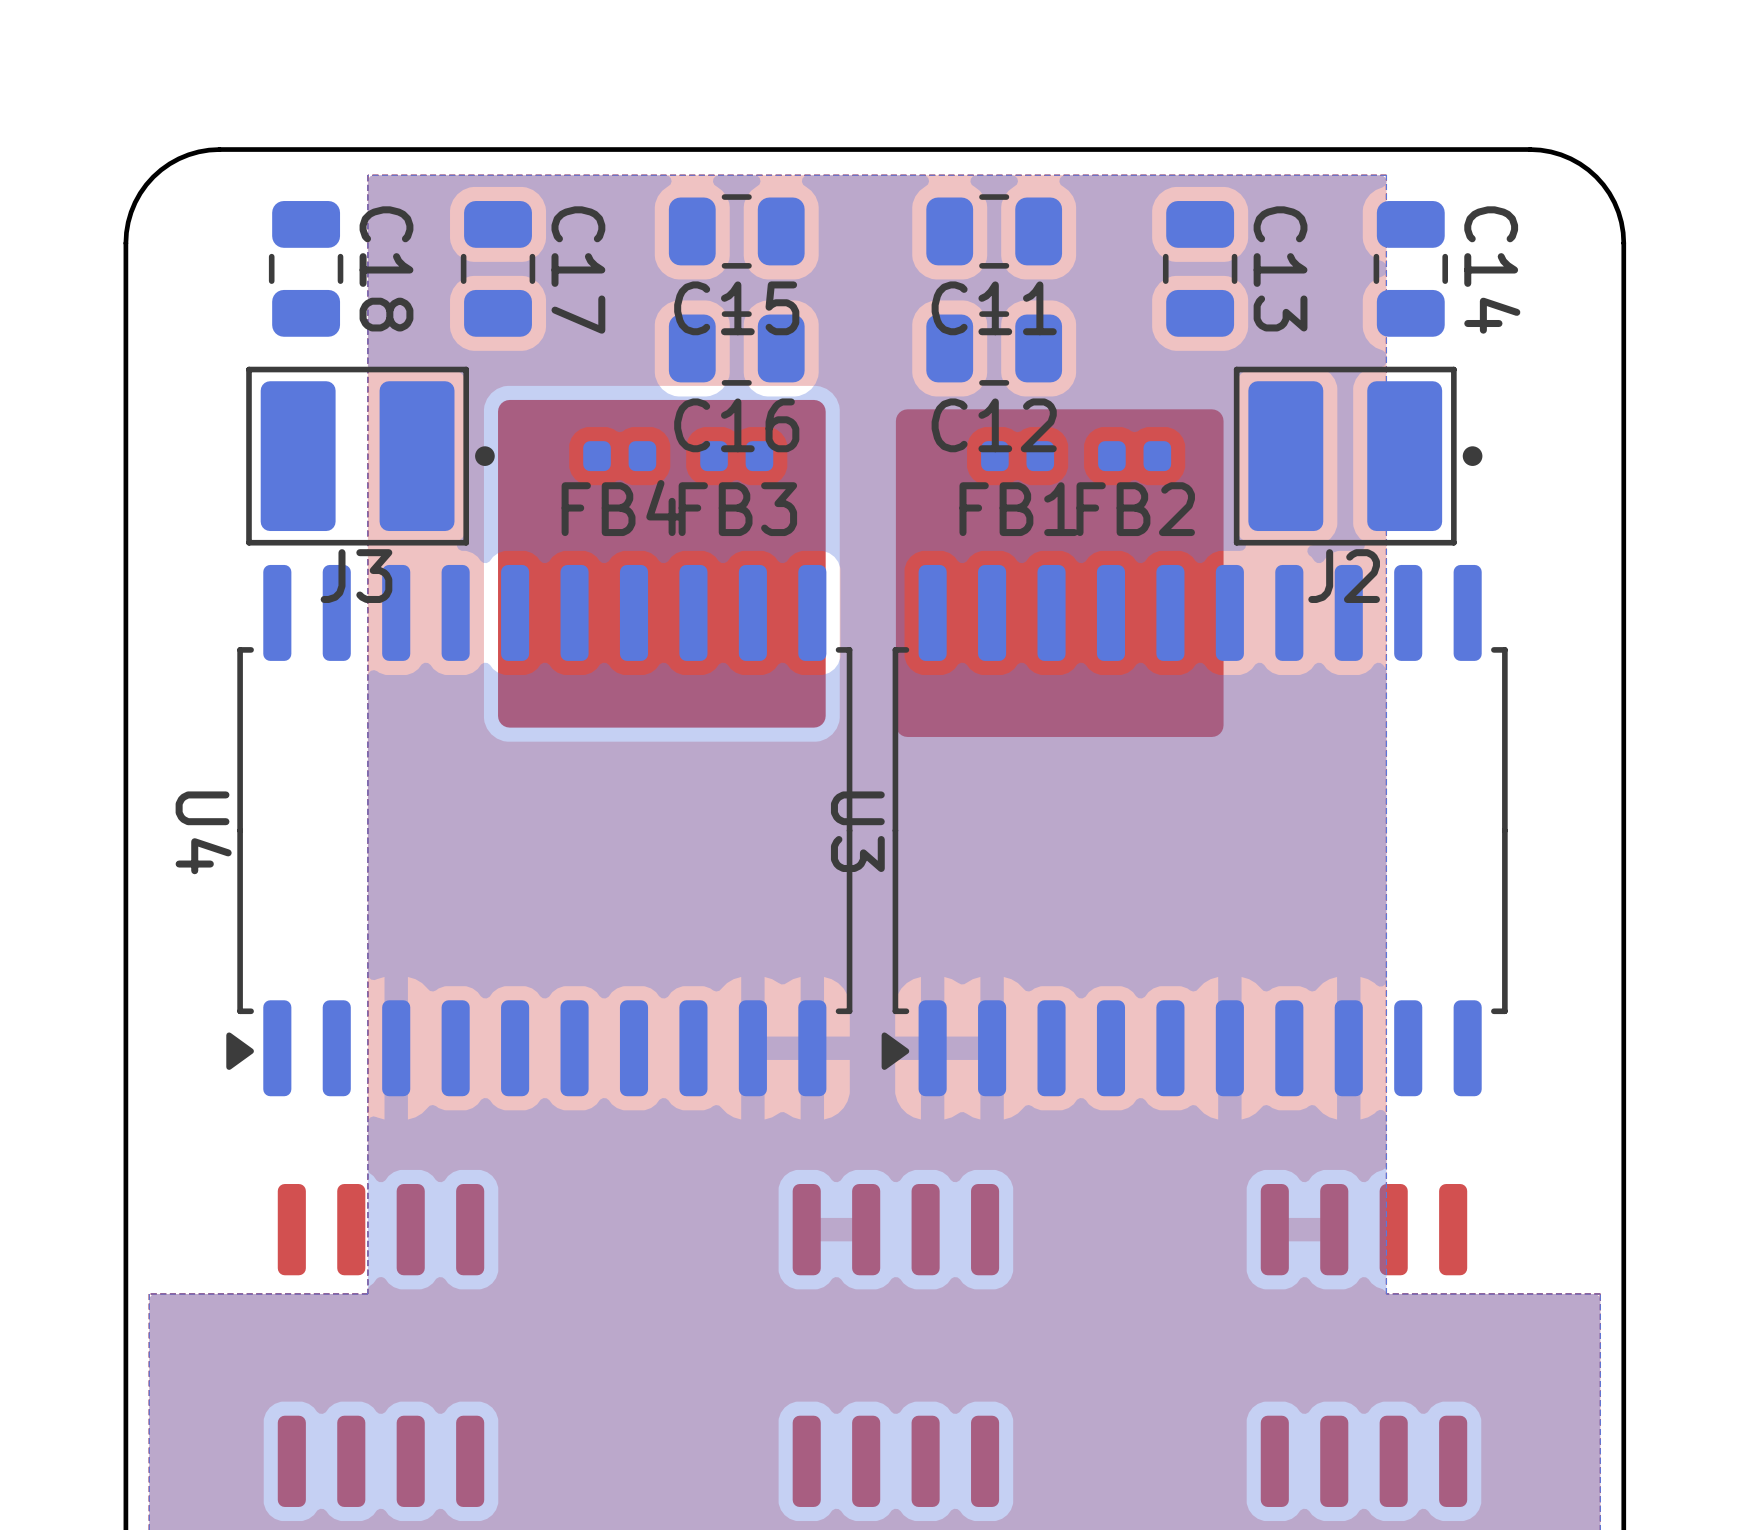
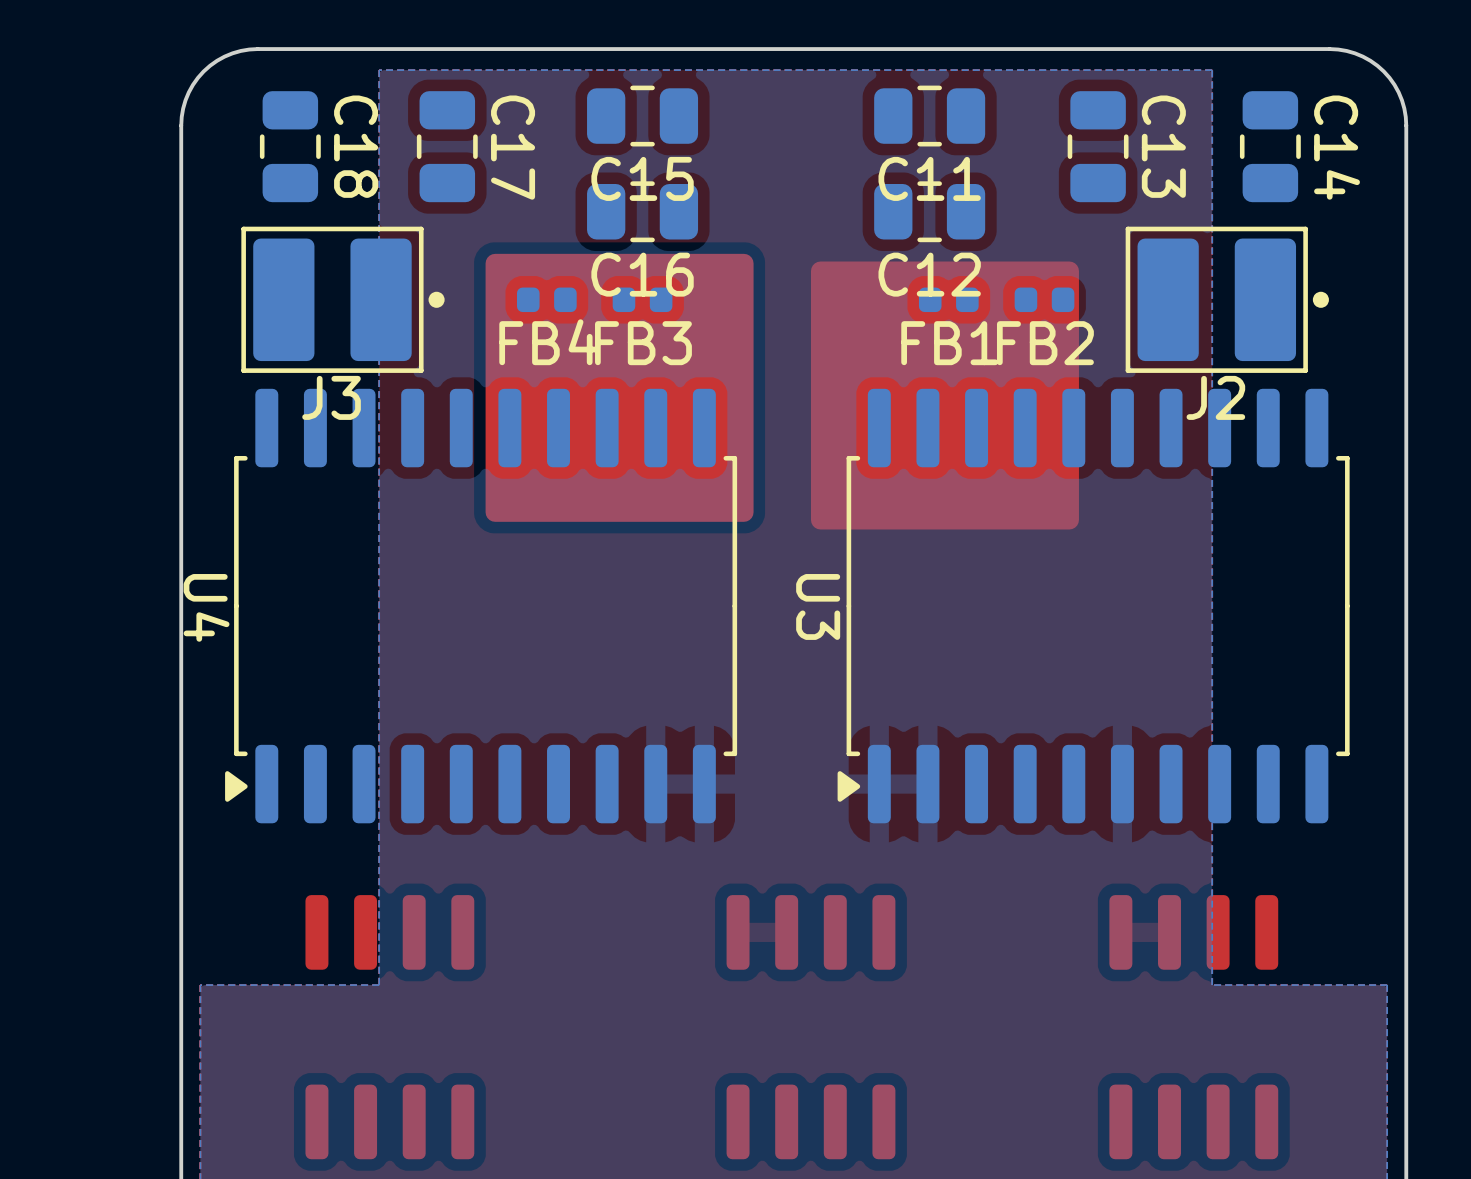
C15 position: (736, 231) -> (642, 116)
C11 position: (994, 231) -> (929, 116)
C18 position: (306, 268) -> (290, 146)
C17 position: (498, 268) -> (447, 146)
C13 position: (1200, 268) -> (1098, 146)
C14 position: (1410, 268) -> (1270, 146)
C16 position: (736, 348) -> (642, 211)
C12 position: (994, 348) -> (929, 211)
J3 position: (370, 456) -> (342, 299)
FB4 position: (619, 456) -> (546, 299)
FB3 position: (736, 456) -> (642, 299)
FB1 position: (1017, 456) -> (948, 299)
FB2 position: (1134, 456) -> (1044, 299)
J2 position: (1358, 456) -> (1227, 299)
U4 position: (539, 830) -> (481, 606)
U3 position: (1194, 830) -> (1093, 606)

